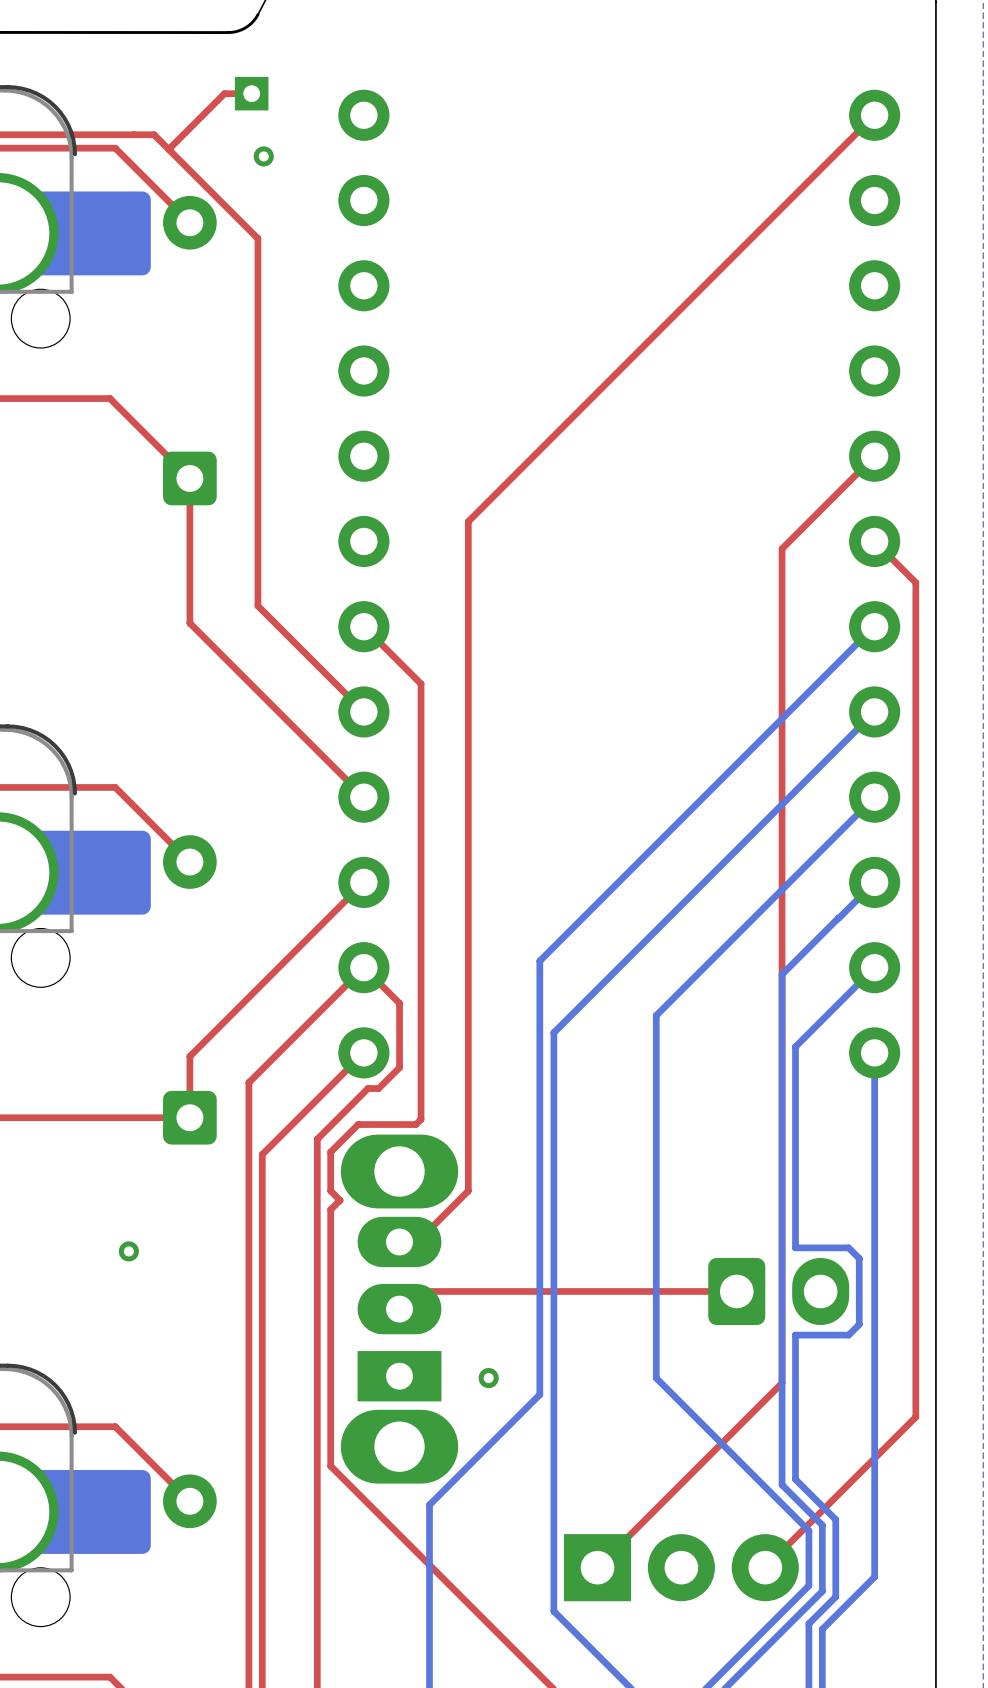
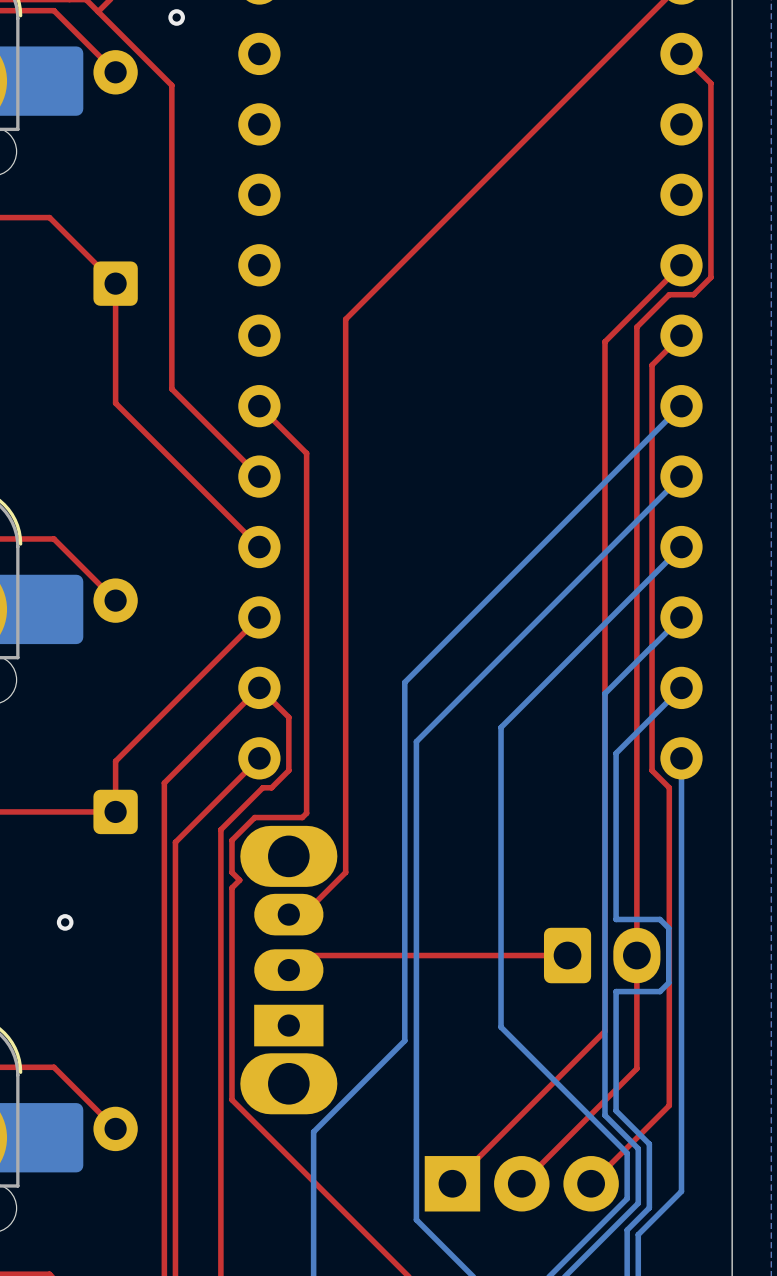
top track: none -> (681, 53) (710, 83) (710, 277) (693, 294) (669, 294) (636, 327) (636, 1068) (521, 1183)
top track: (874, 541) (915, 582) (915, 1417) (859, 1473) -> (681, 335) (652, 365) (652, 770) (669, 787) (669, 1105)
via: (488, 1378) -> none

